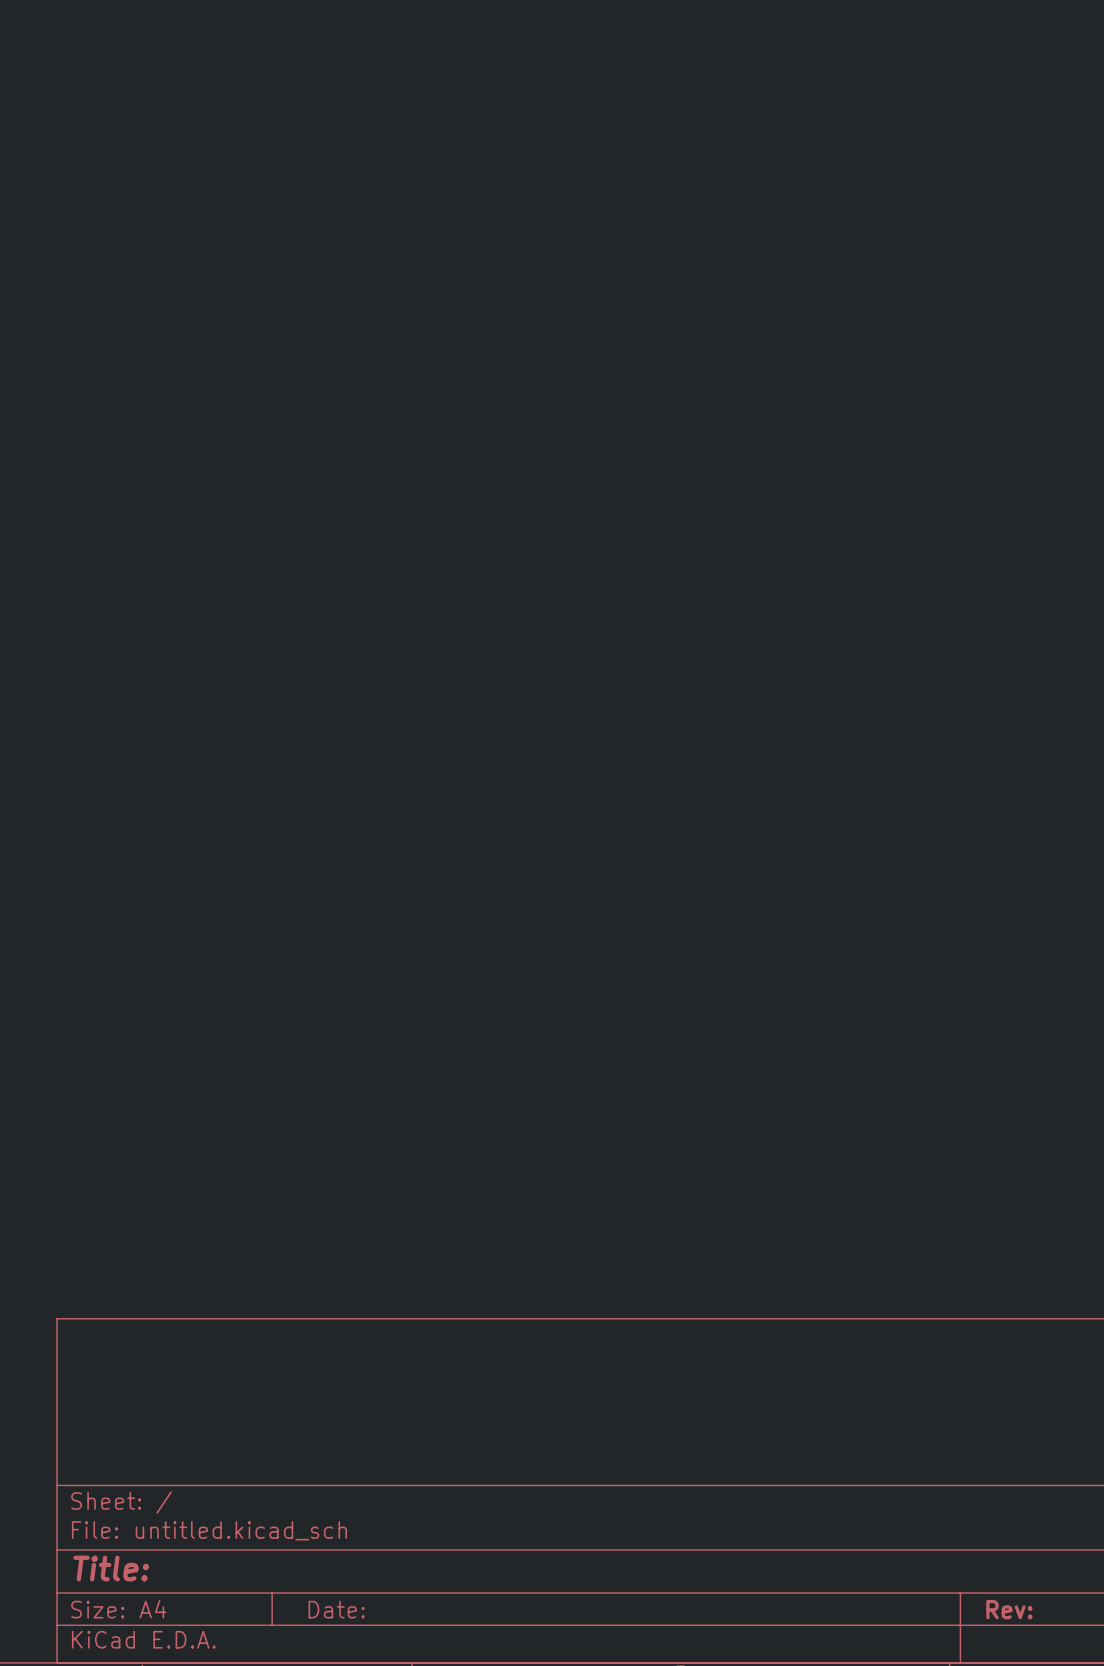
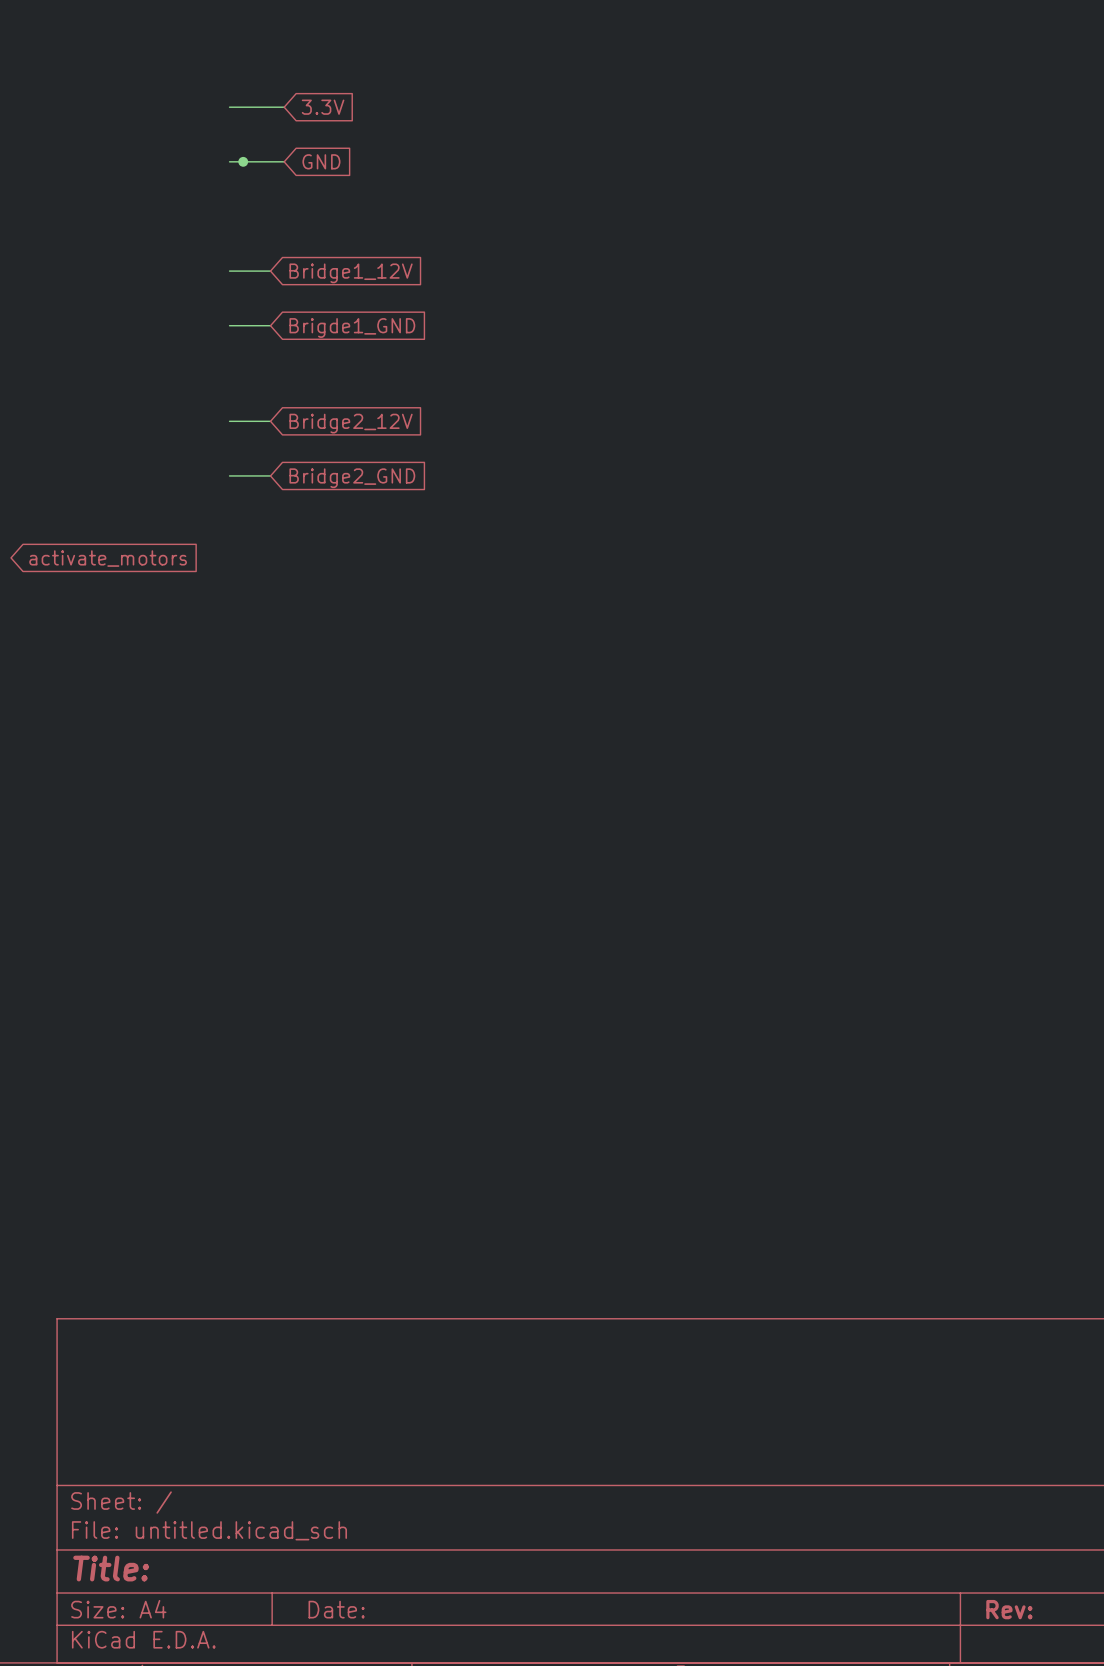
wire: none -> (229, 107) (284, 107)
global label: none -> 3.3V (323, 107)
wire: none -> (229, 161) (284, 161)
junction: none -> (243, 161)
global label: none -> GND (321, 161)
wire: none -> (229, 271) (270, 271)
global label: none -> Bridge1_12V (351, 273)
wire: none -> (229, 325) (270, 325)
global label: none -> Brigde1_GND (352, 328)
wire: none -> (229, 421) (270, 421)
global label: none -> Bridge2_12V (351, 423)
wire: none -> (229, 475) (270, 475)
global label: none -> Bridge2_GND (352, 478)
global label: none -> activate_motors (108, 558)

